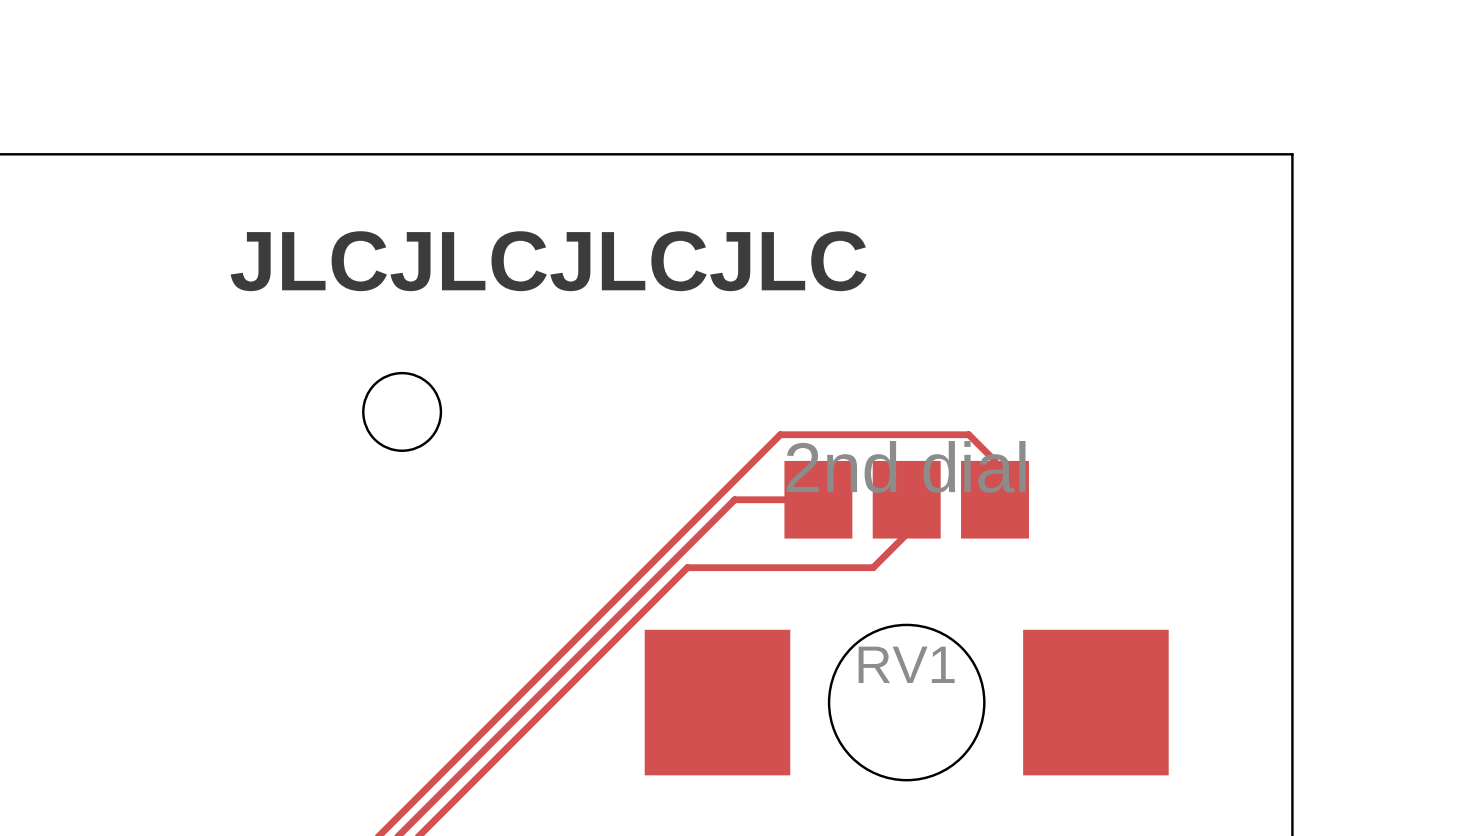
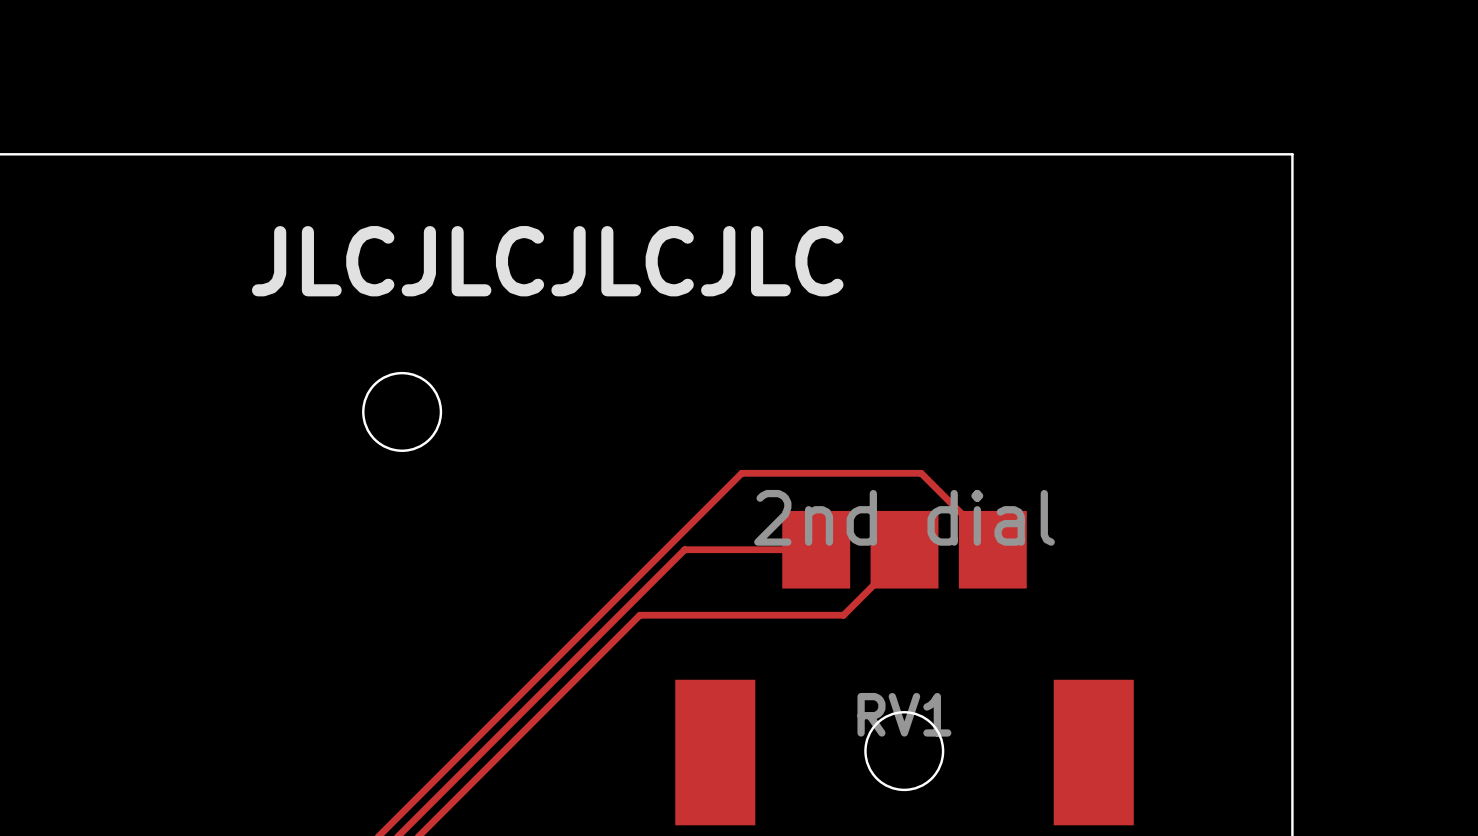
RV1 footprint: [644, 460, 1169, 776] -> [675, 510, 1134, 826]
track: (741, 473) (780, 434) (968, 434) (995, 460) (995, 499) -> (741, 473) (921, 473) (992, 544) (992, 549)
track: (818, 499) (734, 499) (684, 549) -> (816, 549) (684, 549)
track: (906, 499) (906, 534) (873, 567) (687, 567) (639, 615) -> (904, 549) (904, 554) (843, 615) (639, 615)
round board edge: [827, 623, 986, 782] -> none
round board edge: none -> [864, 711, 945, 792]

